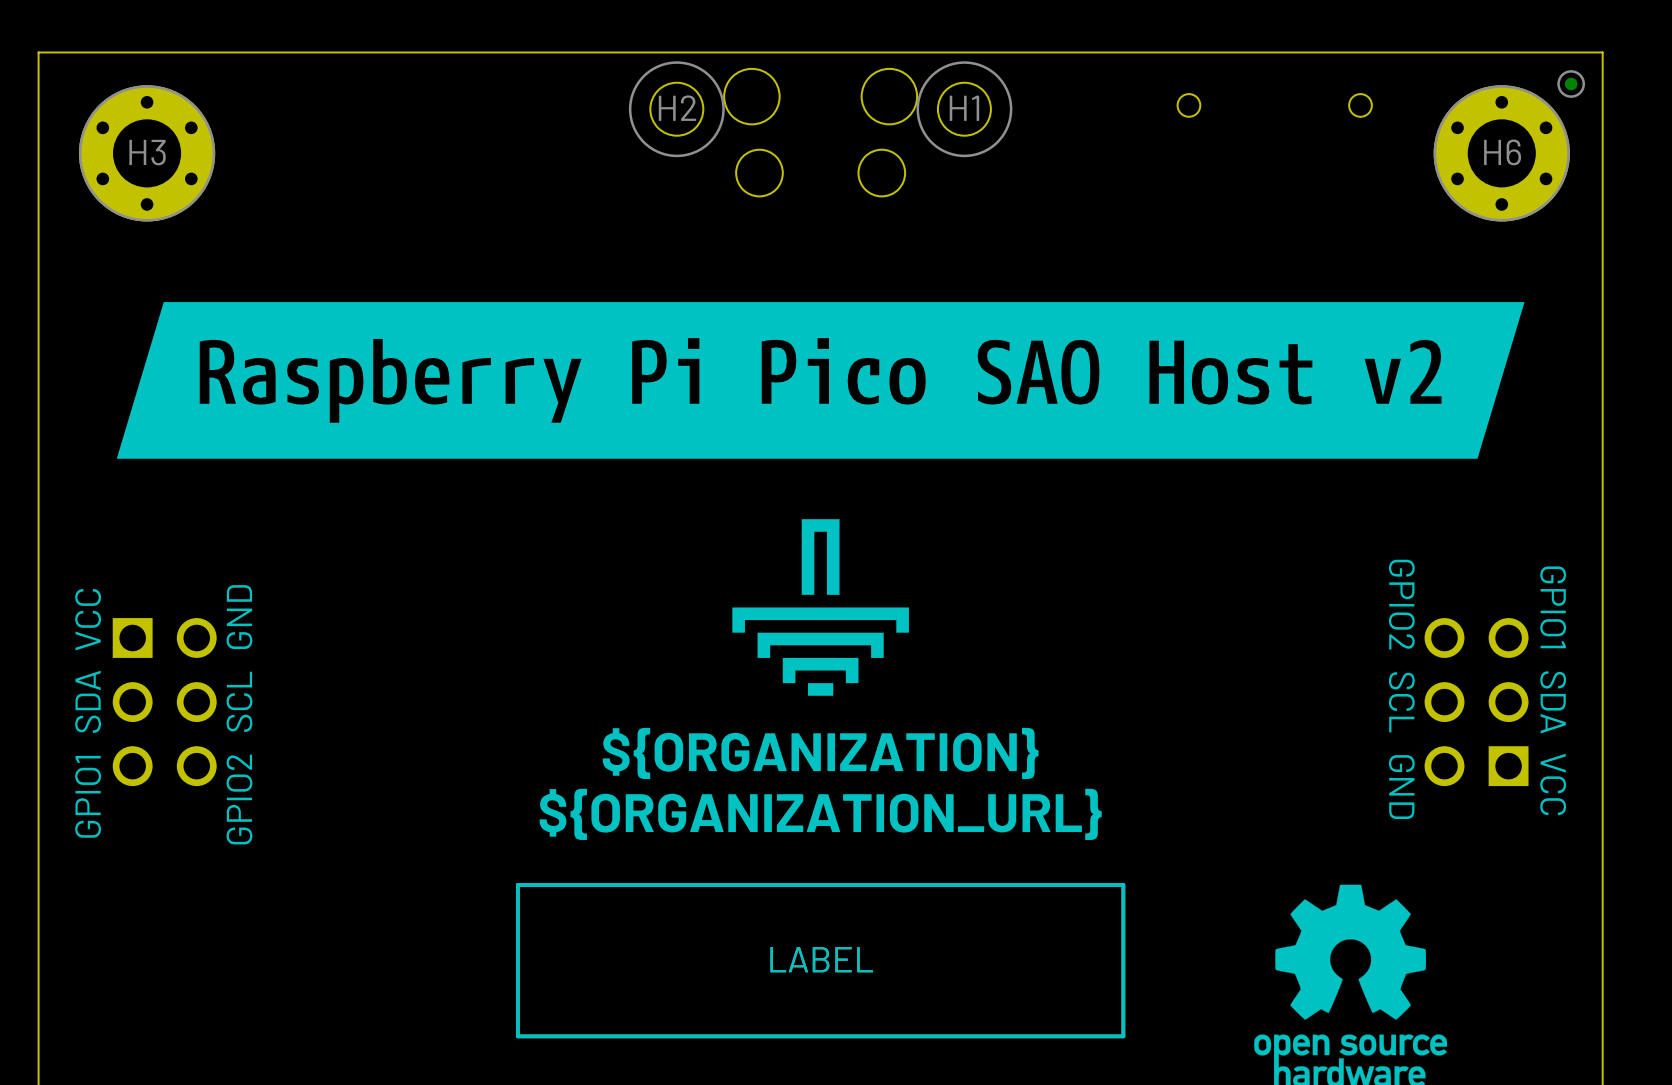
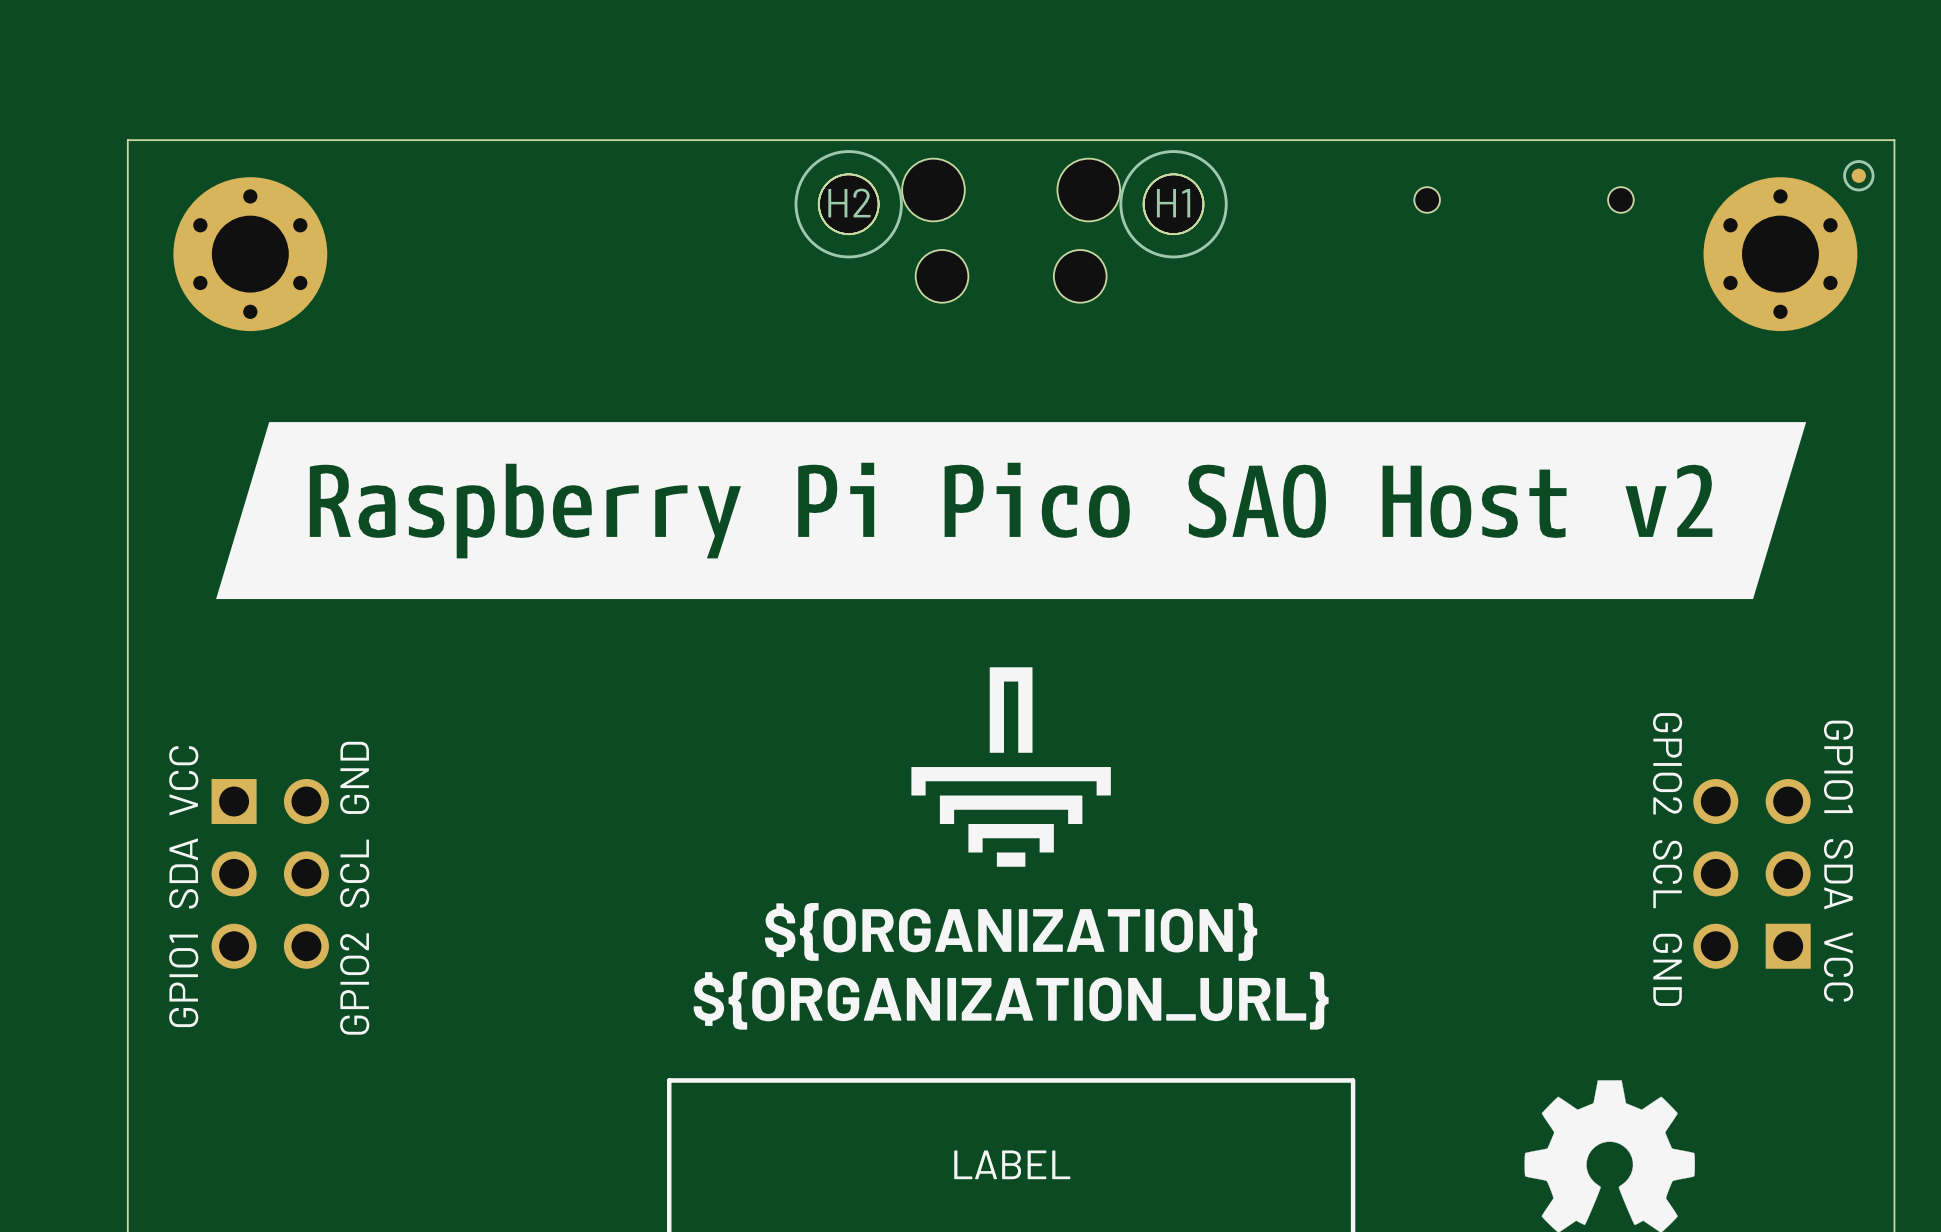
part: none -> (848, 204)
part: none -> (1173, 204)
H3: (147, 153) -> none
part: none -> (250, 254)
H6: (1501, 153) -> none
part: none -> (1780, 254)

